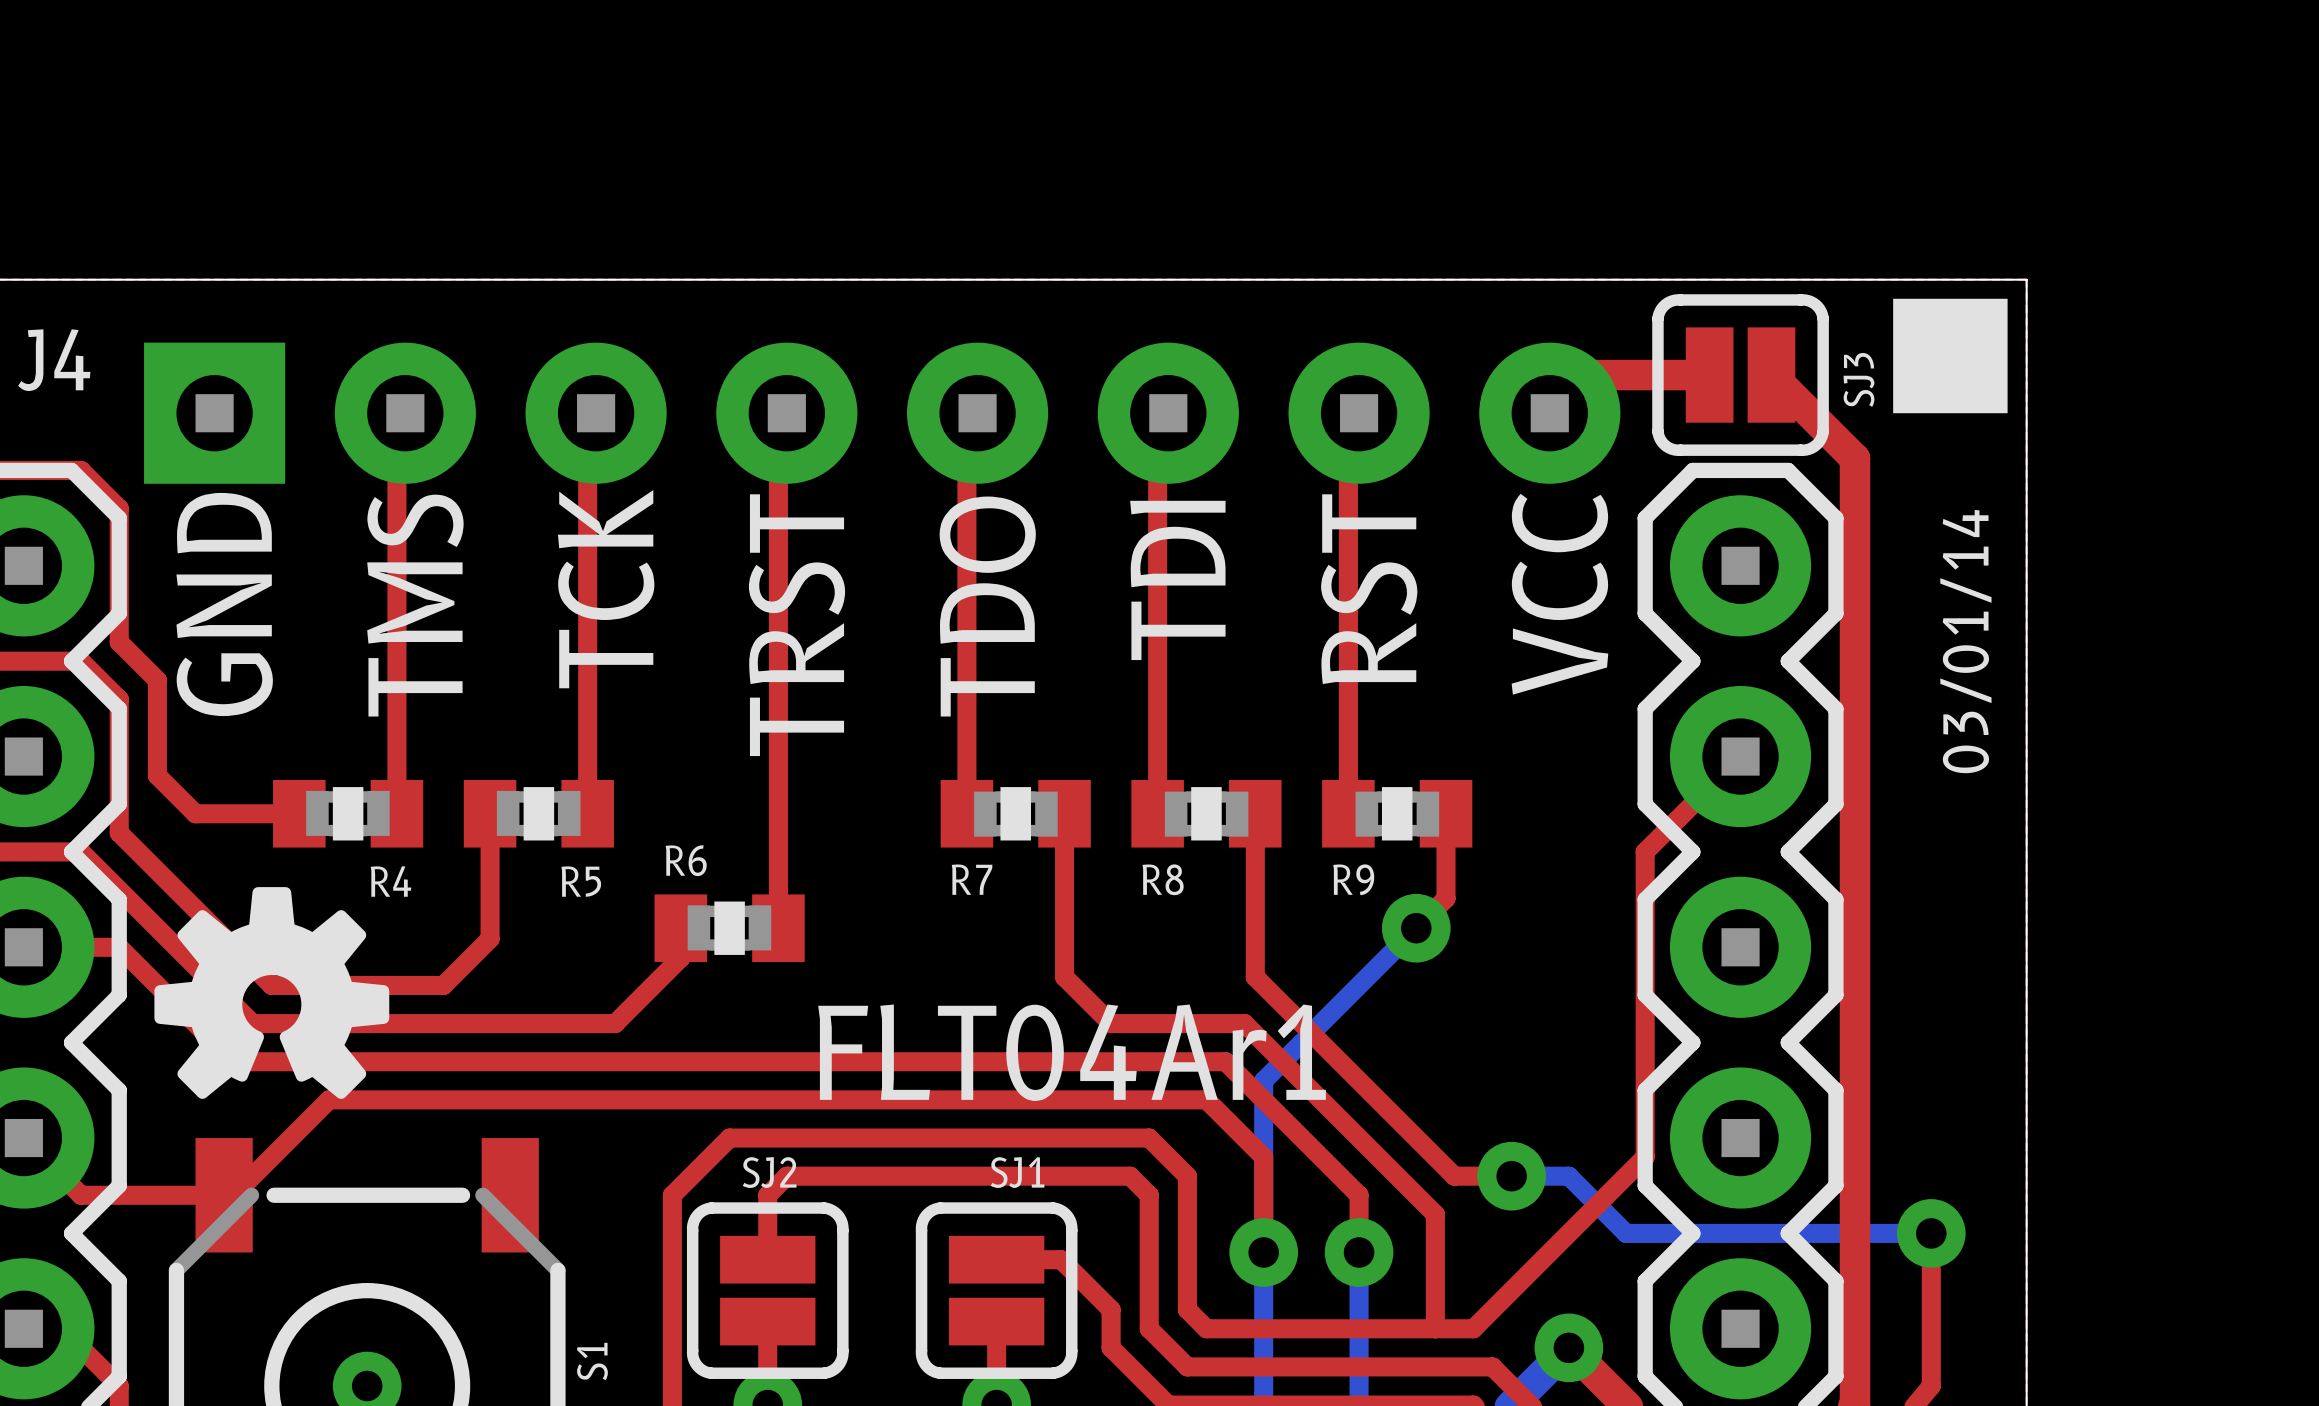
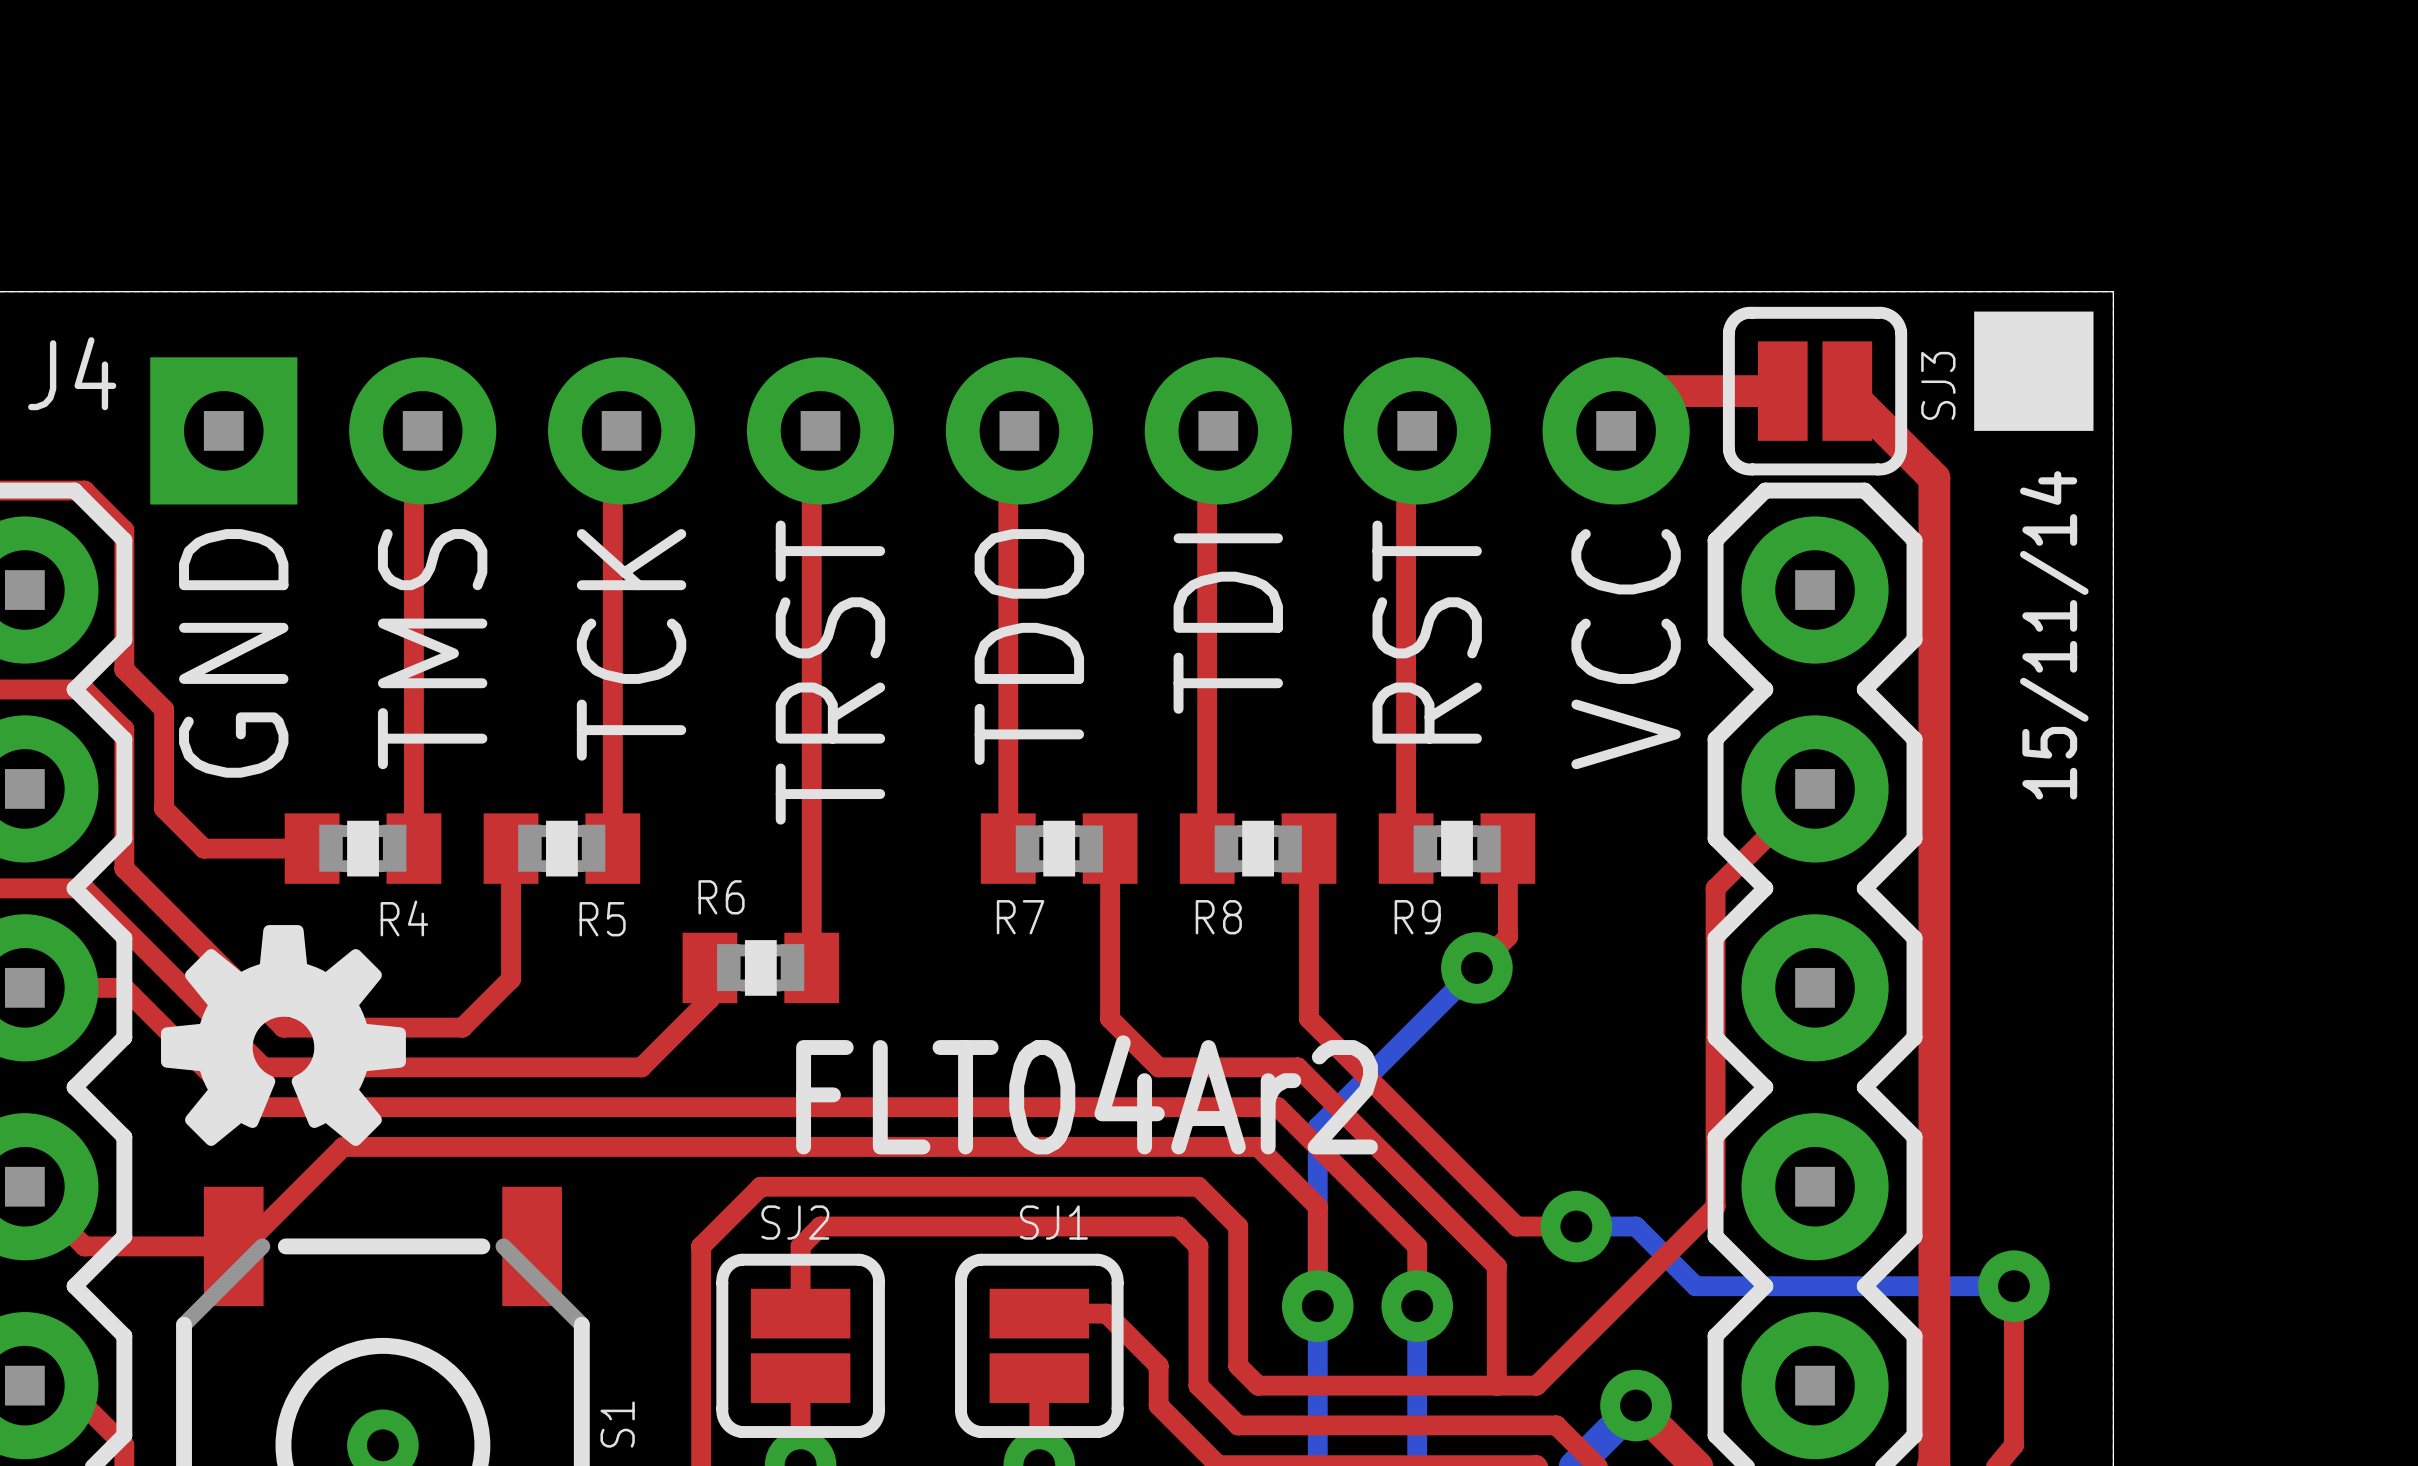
text: 03/01/14 (1965, 641) -> 15/11/14 (2054, 635)
text: FLT04Ar1 (1072, 1052) -> FLT04Ar2 (1087, 1094)

